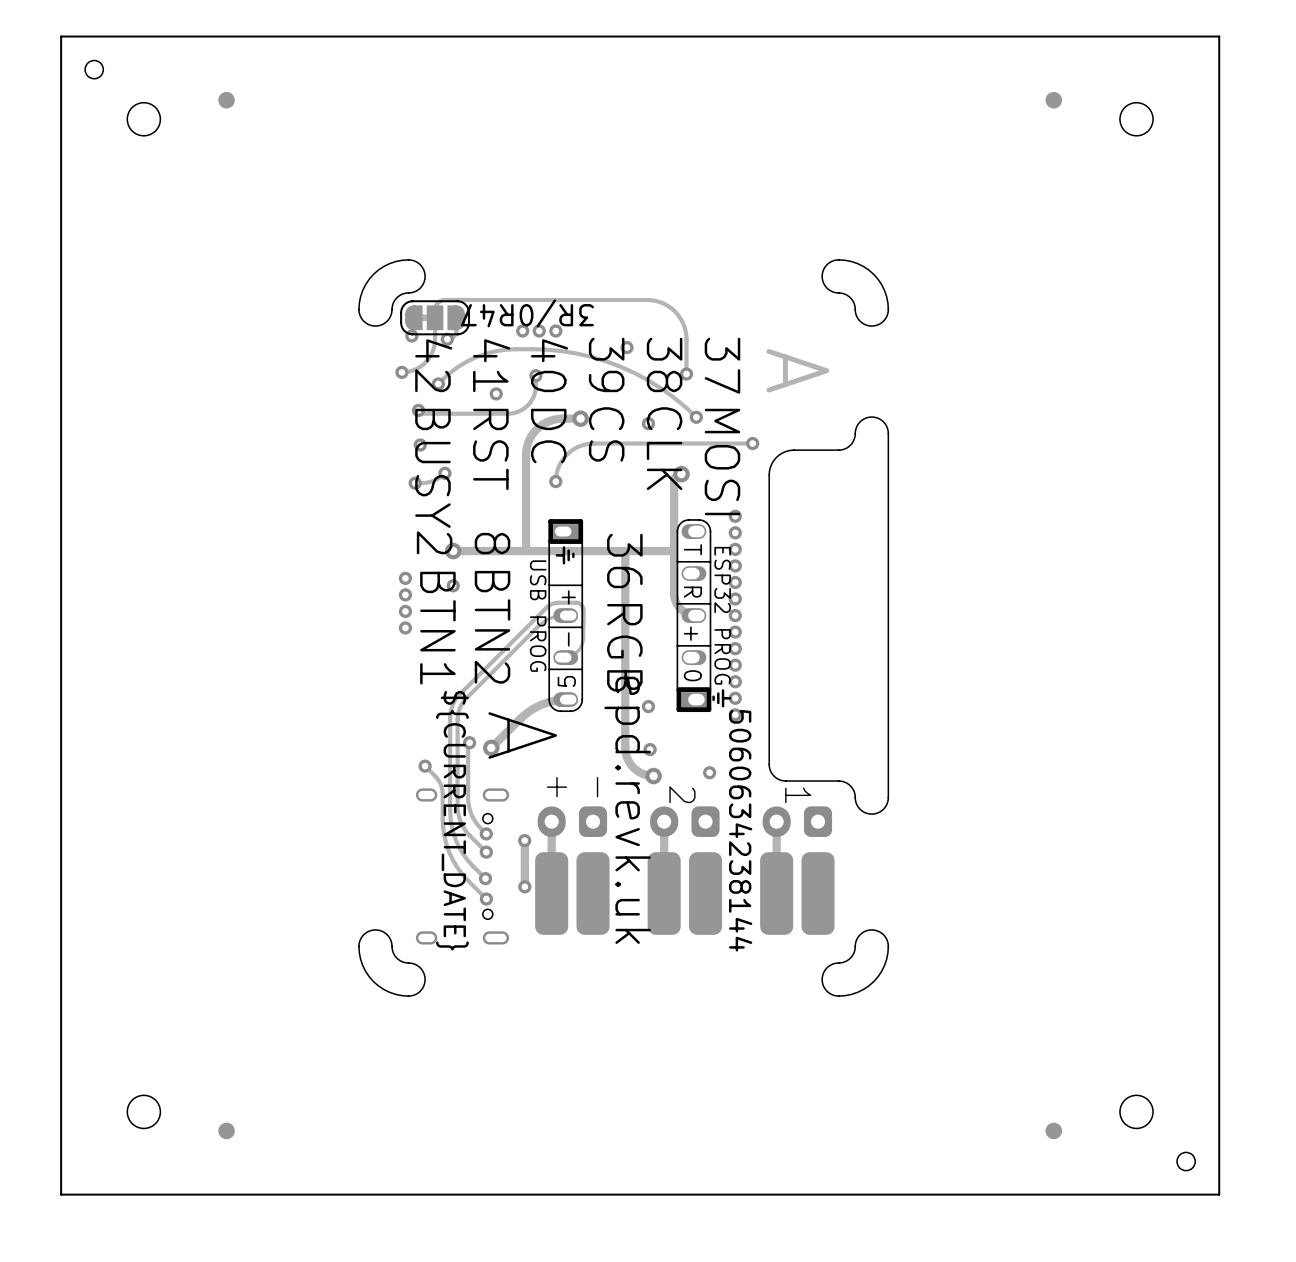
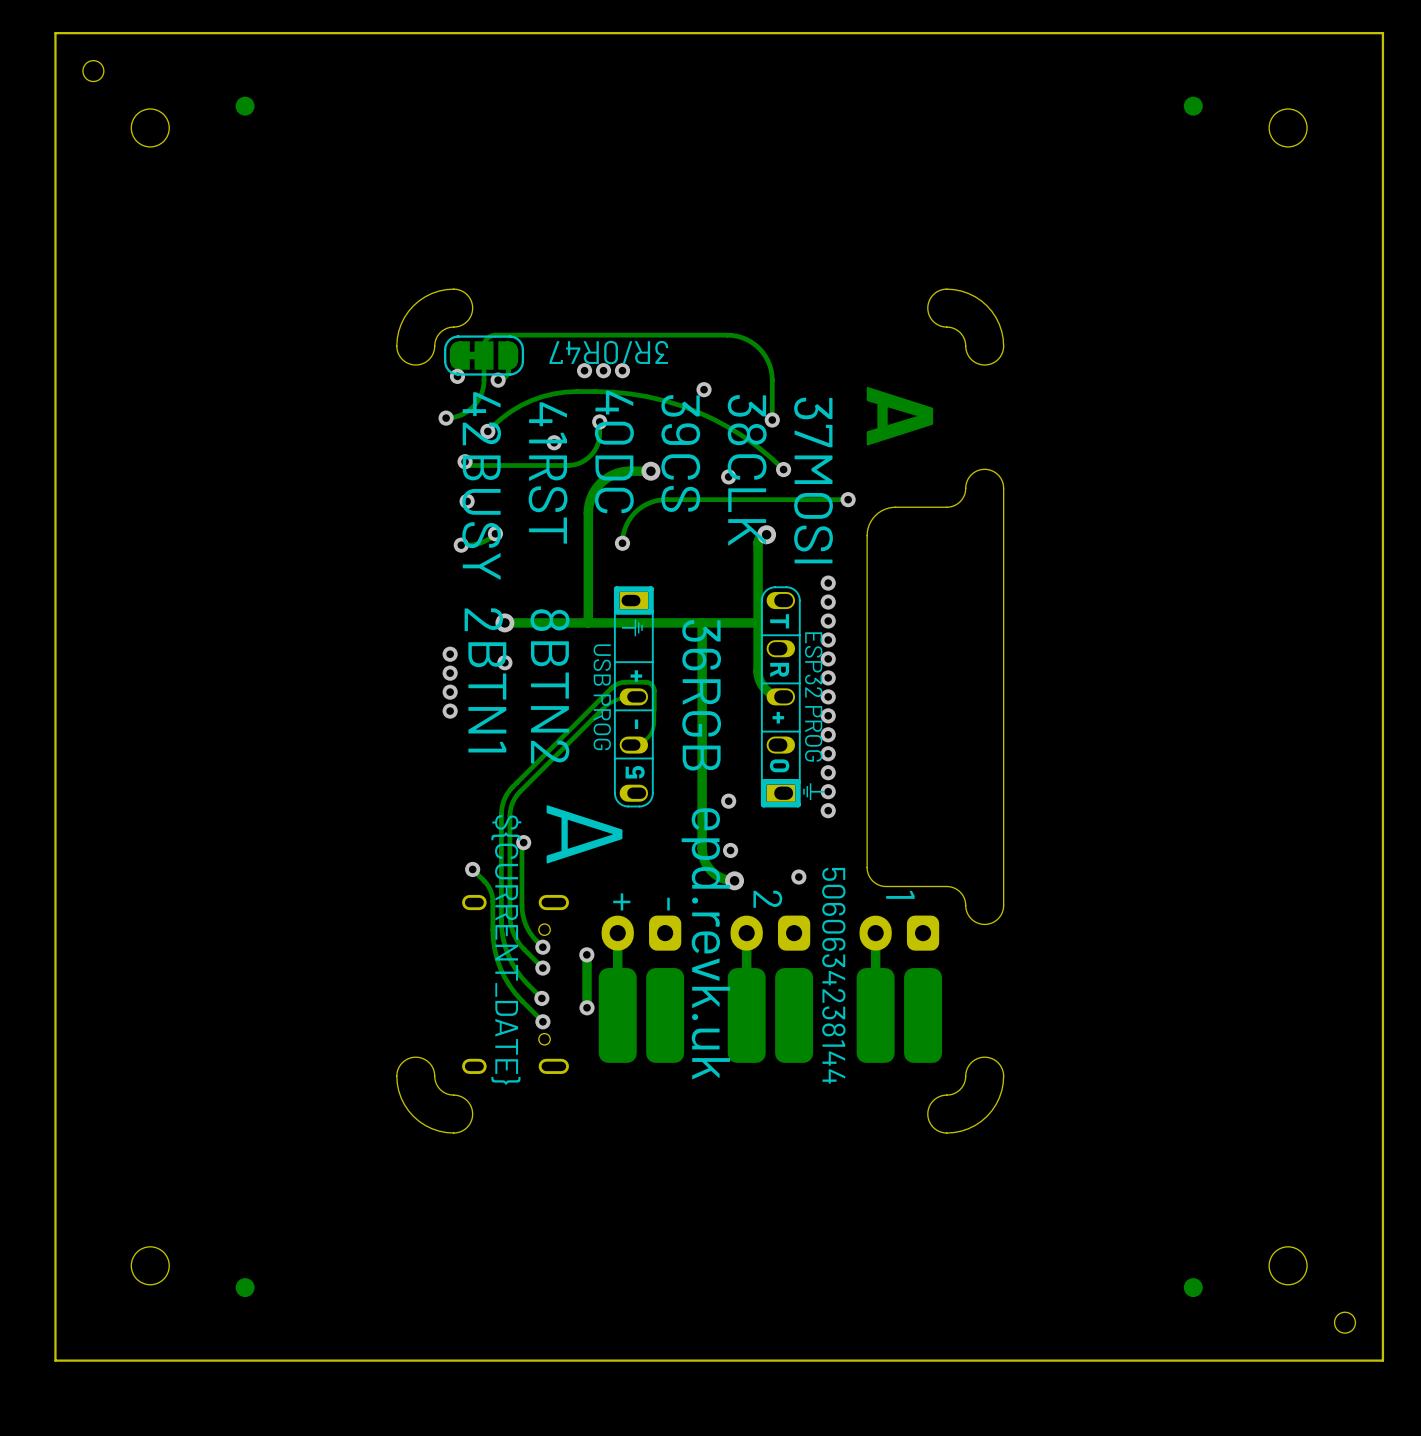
track: (568, 699) (547, 702) (530, 710) (491, 747) -> none
via: (491, 747) -> none

